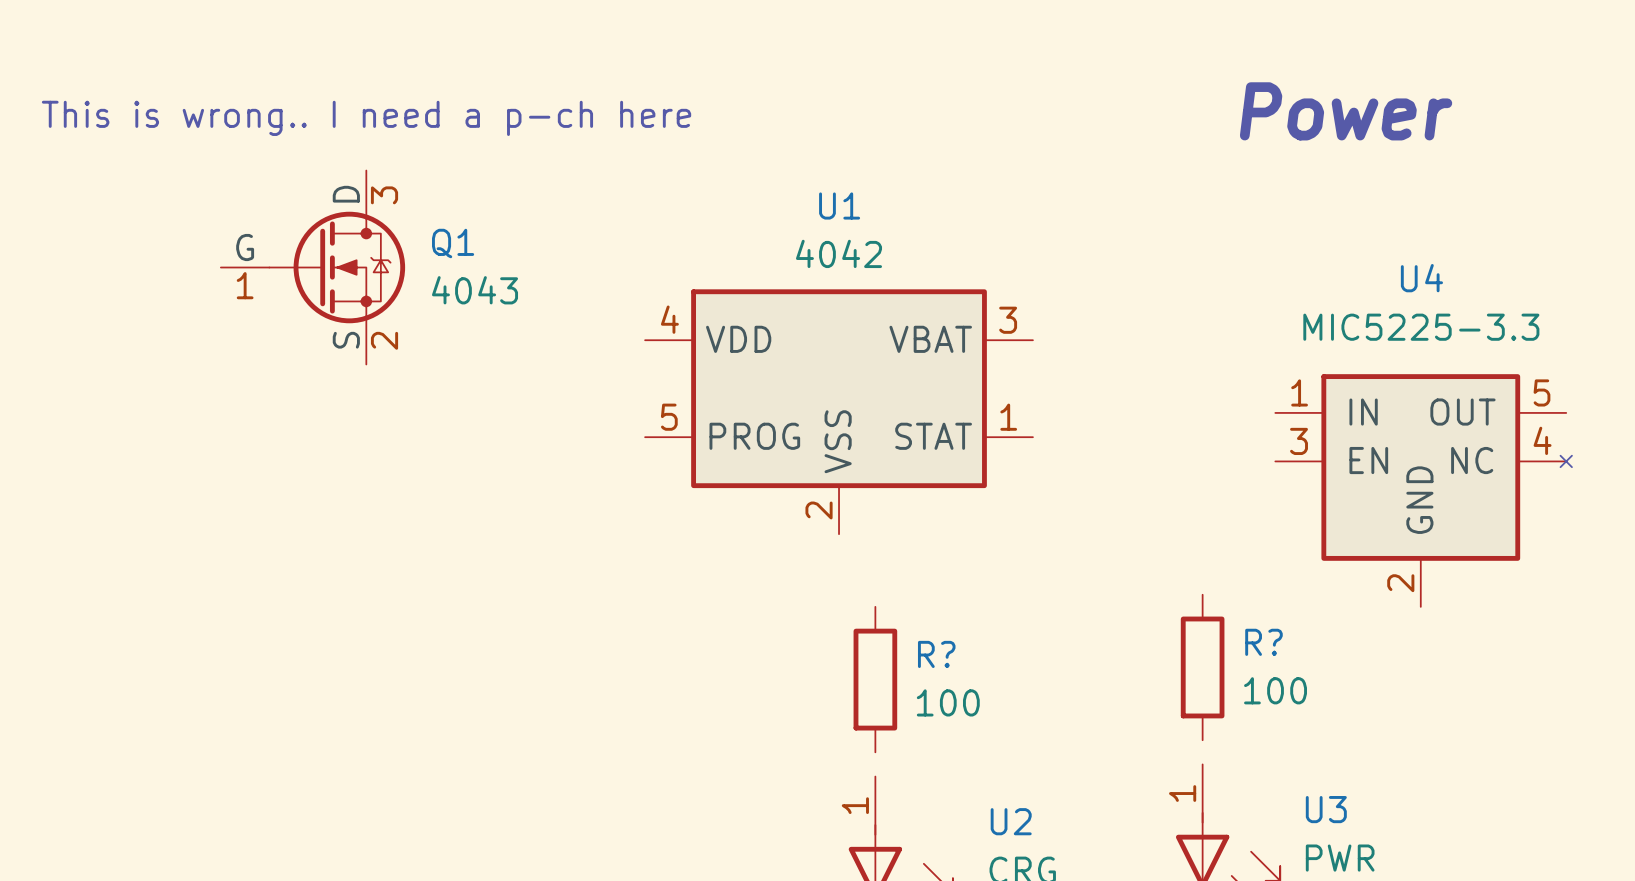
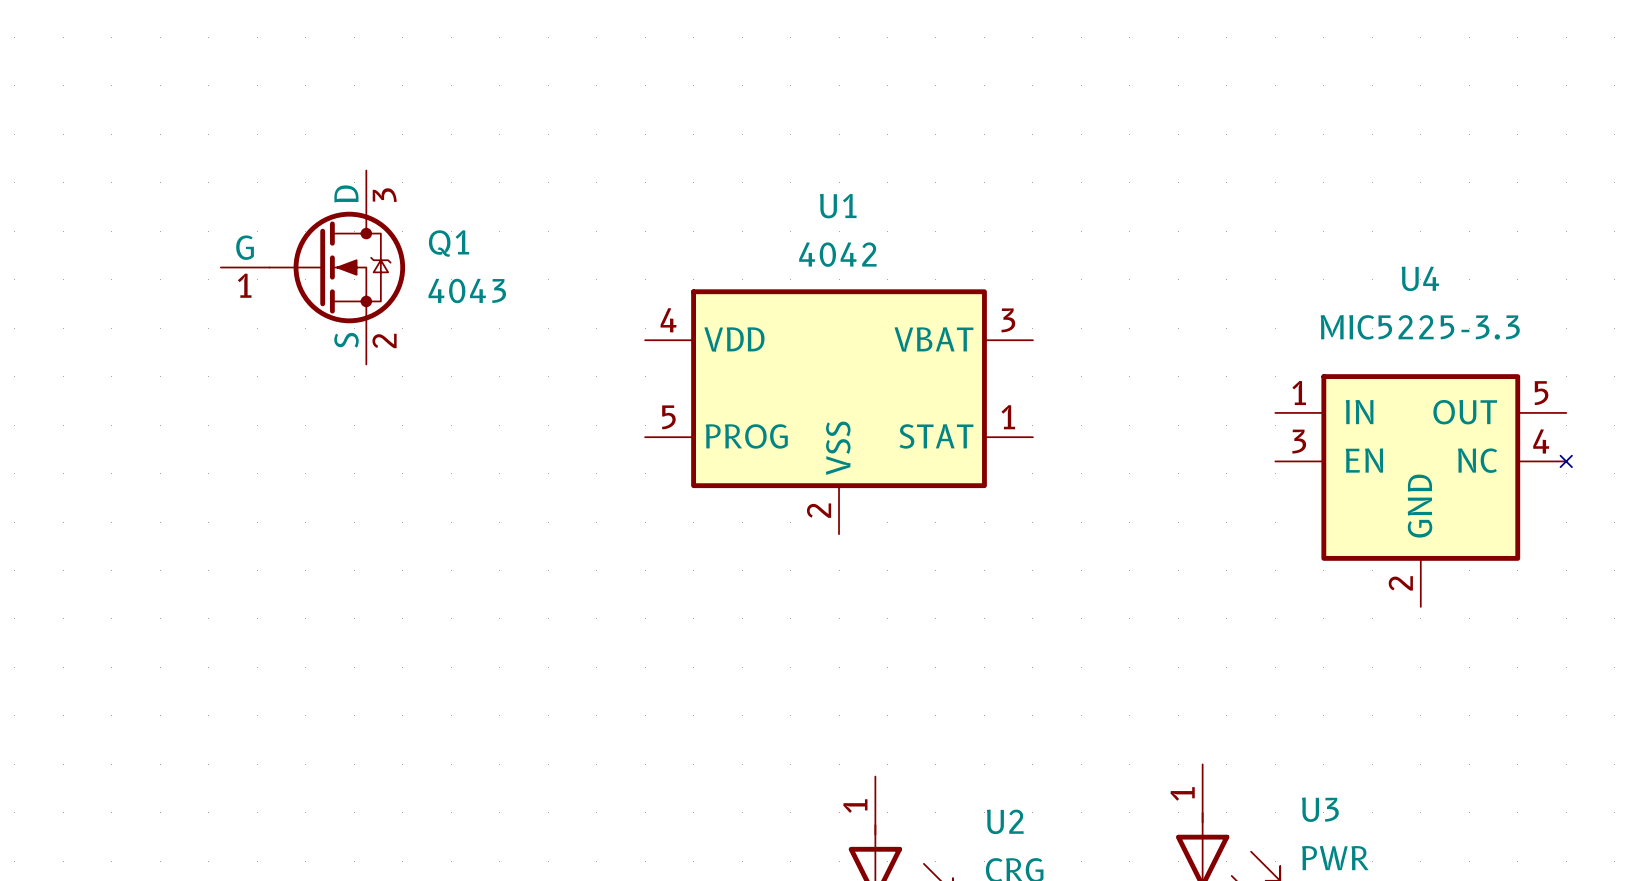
text: Power (1346, 111) -> none
text: This is wrong.. I need a p-ch here (366, 118) -> none
R?: (1202, 667) -> none
R?: (875, 679) -> none

